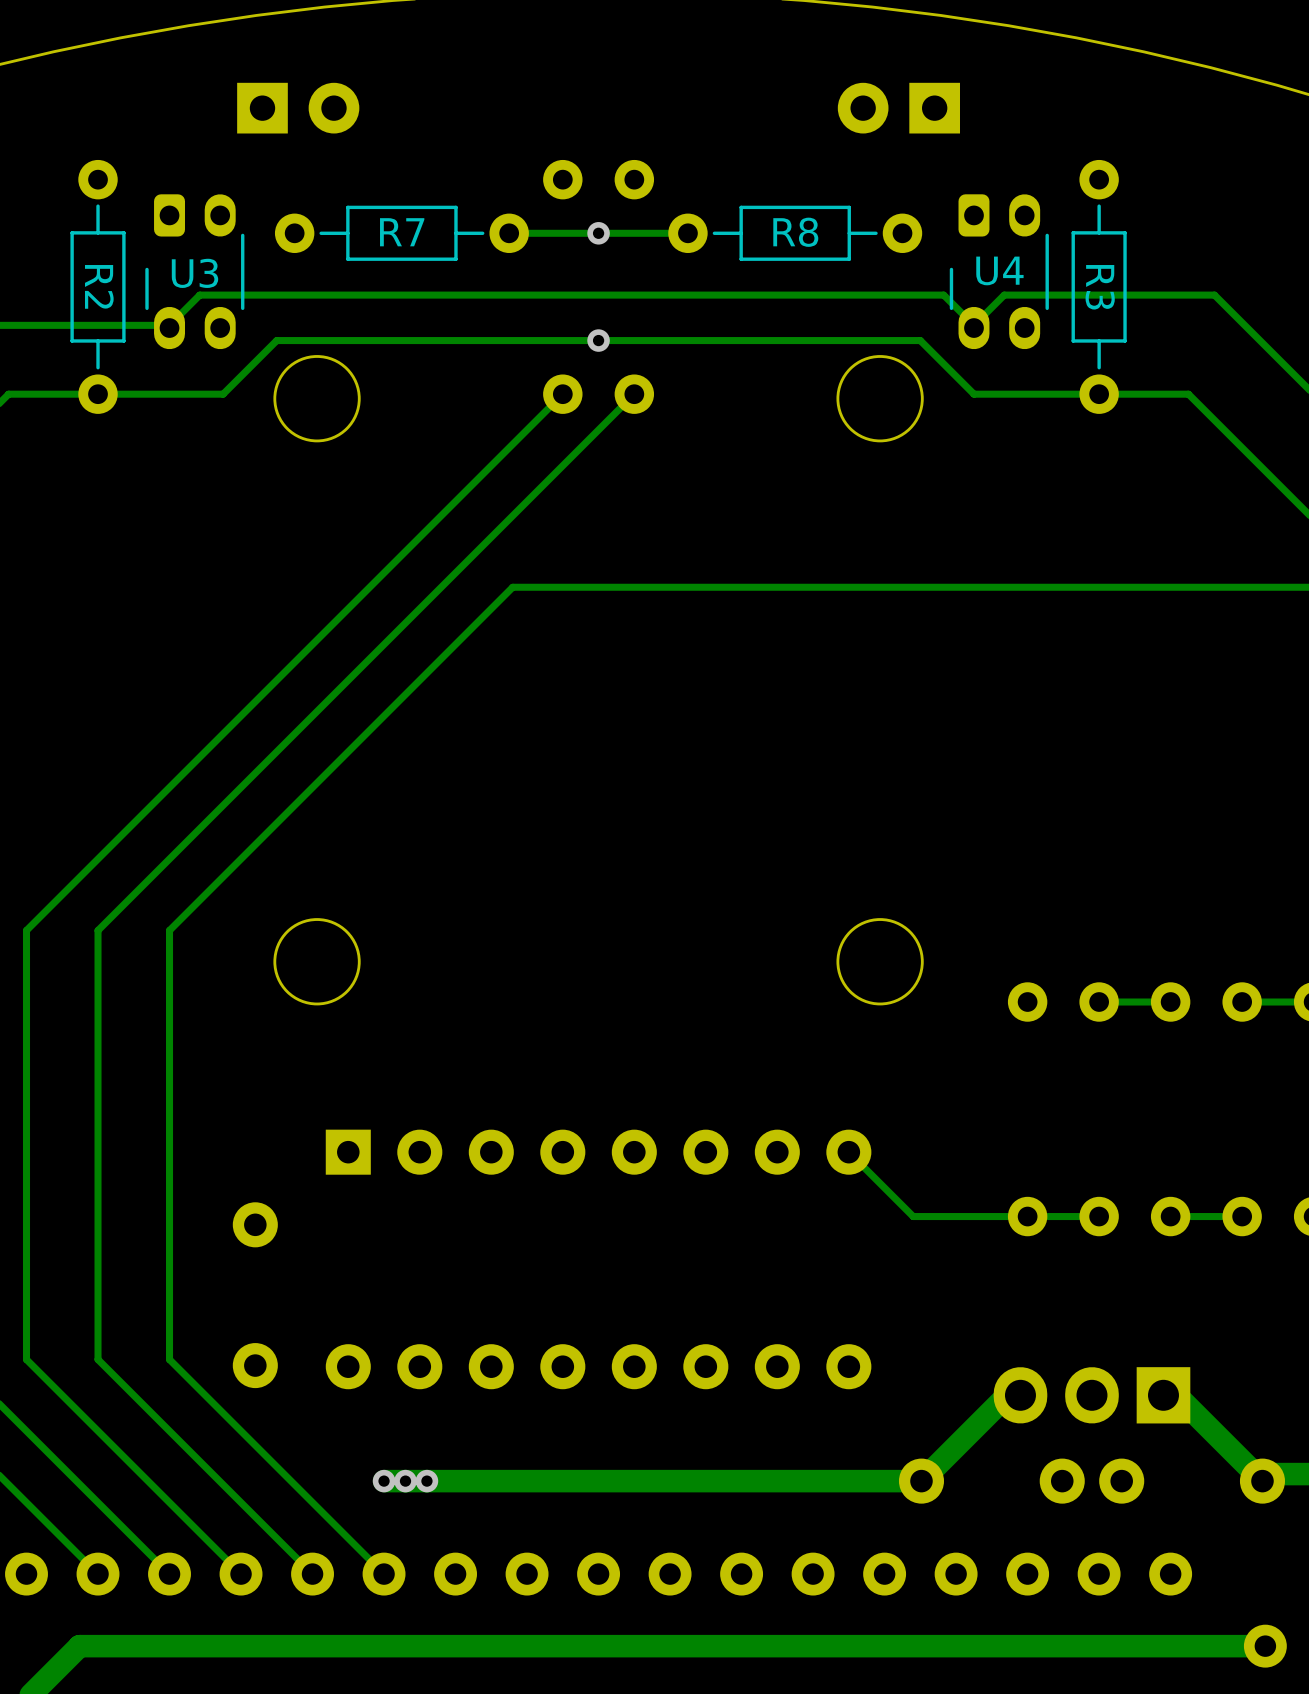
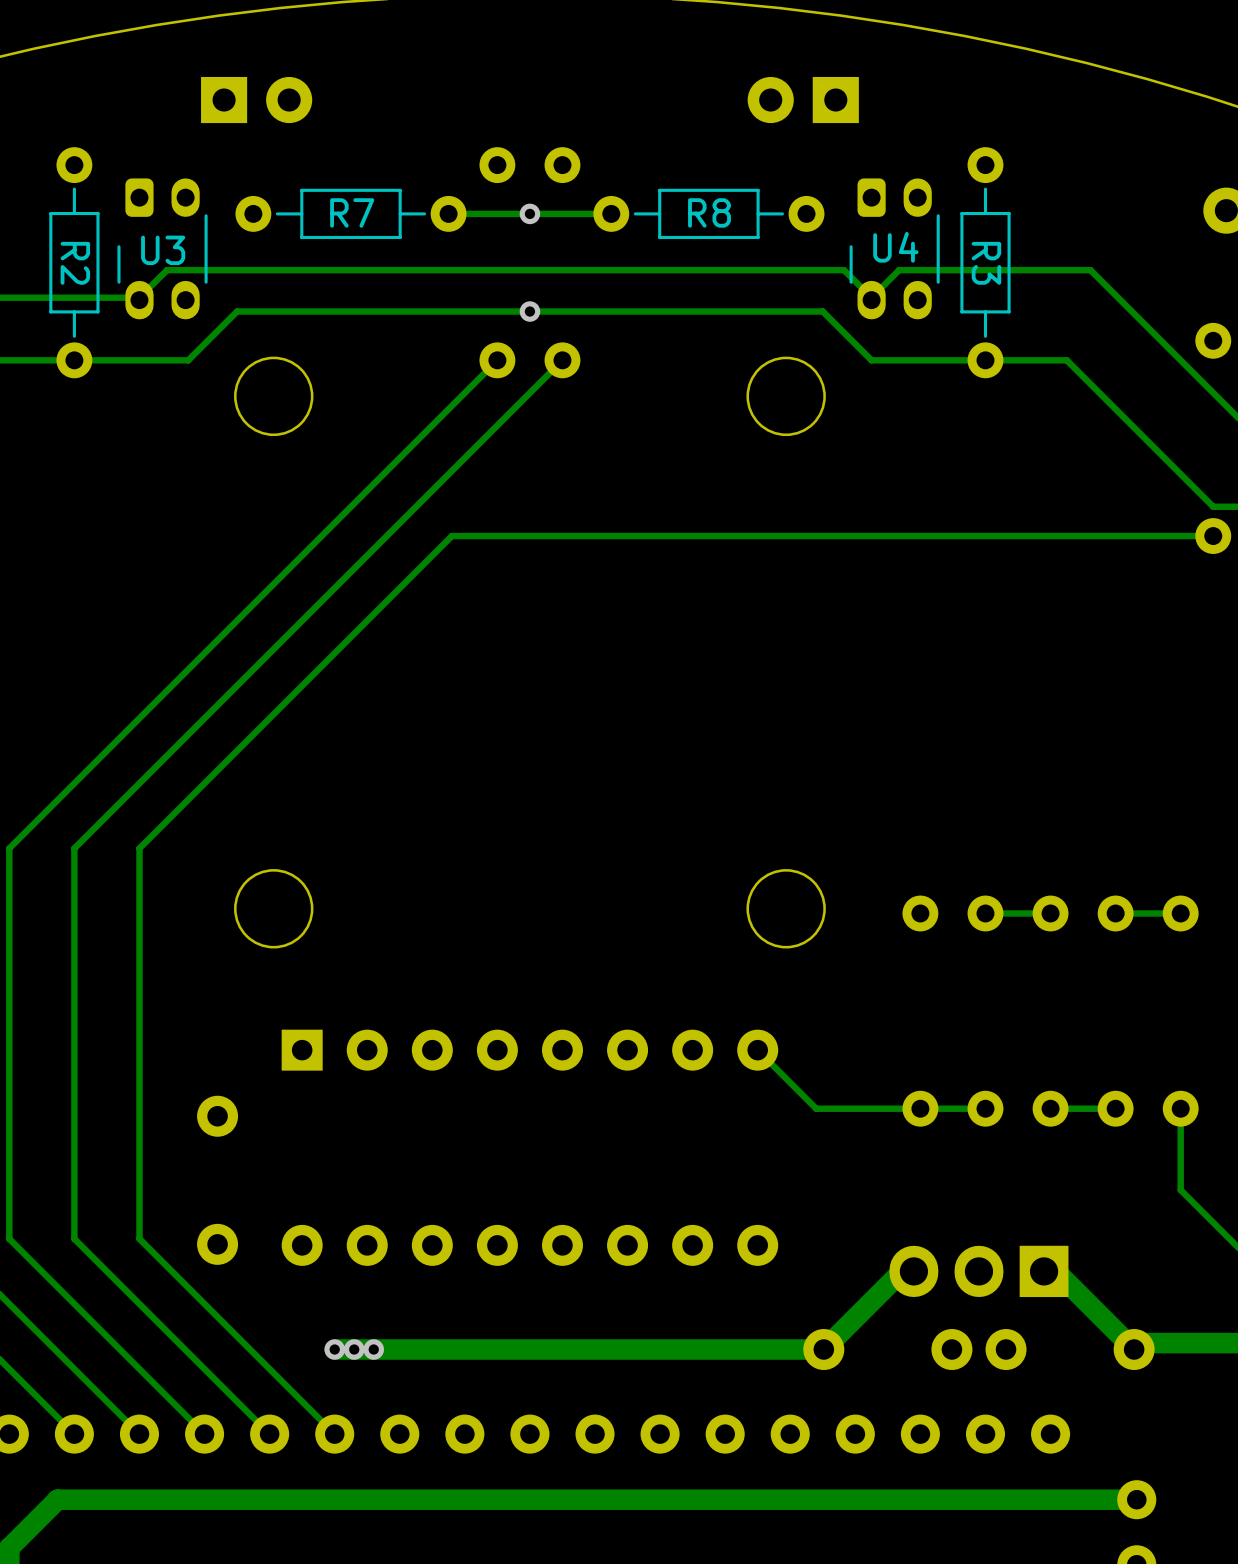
round board edge position: (317, 398) -> (273, 396)
round board edge position: (880, 398) -> (786, 396)
round board edge position: (317, 961) -> (273, 908)
round board edge position: (880, 961) -> (786, 908)

